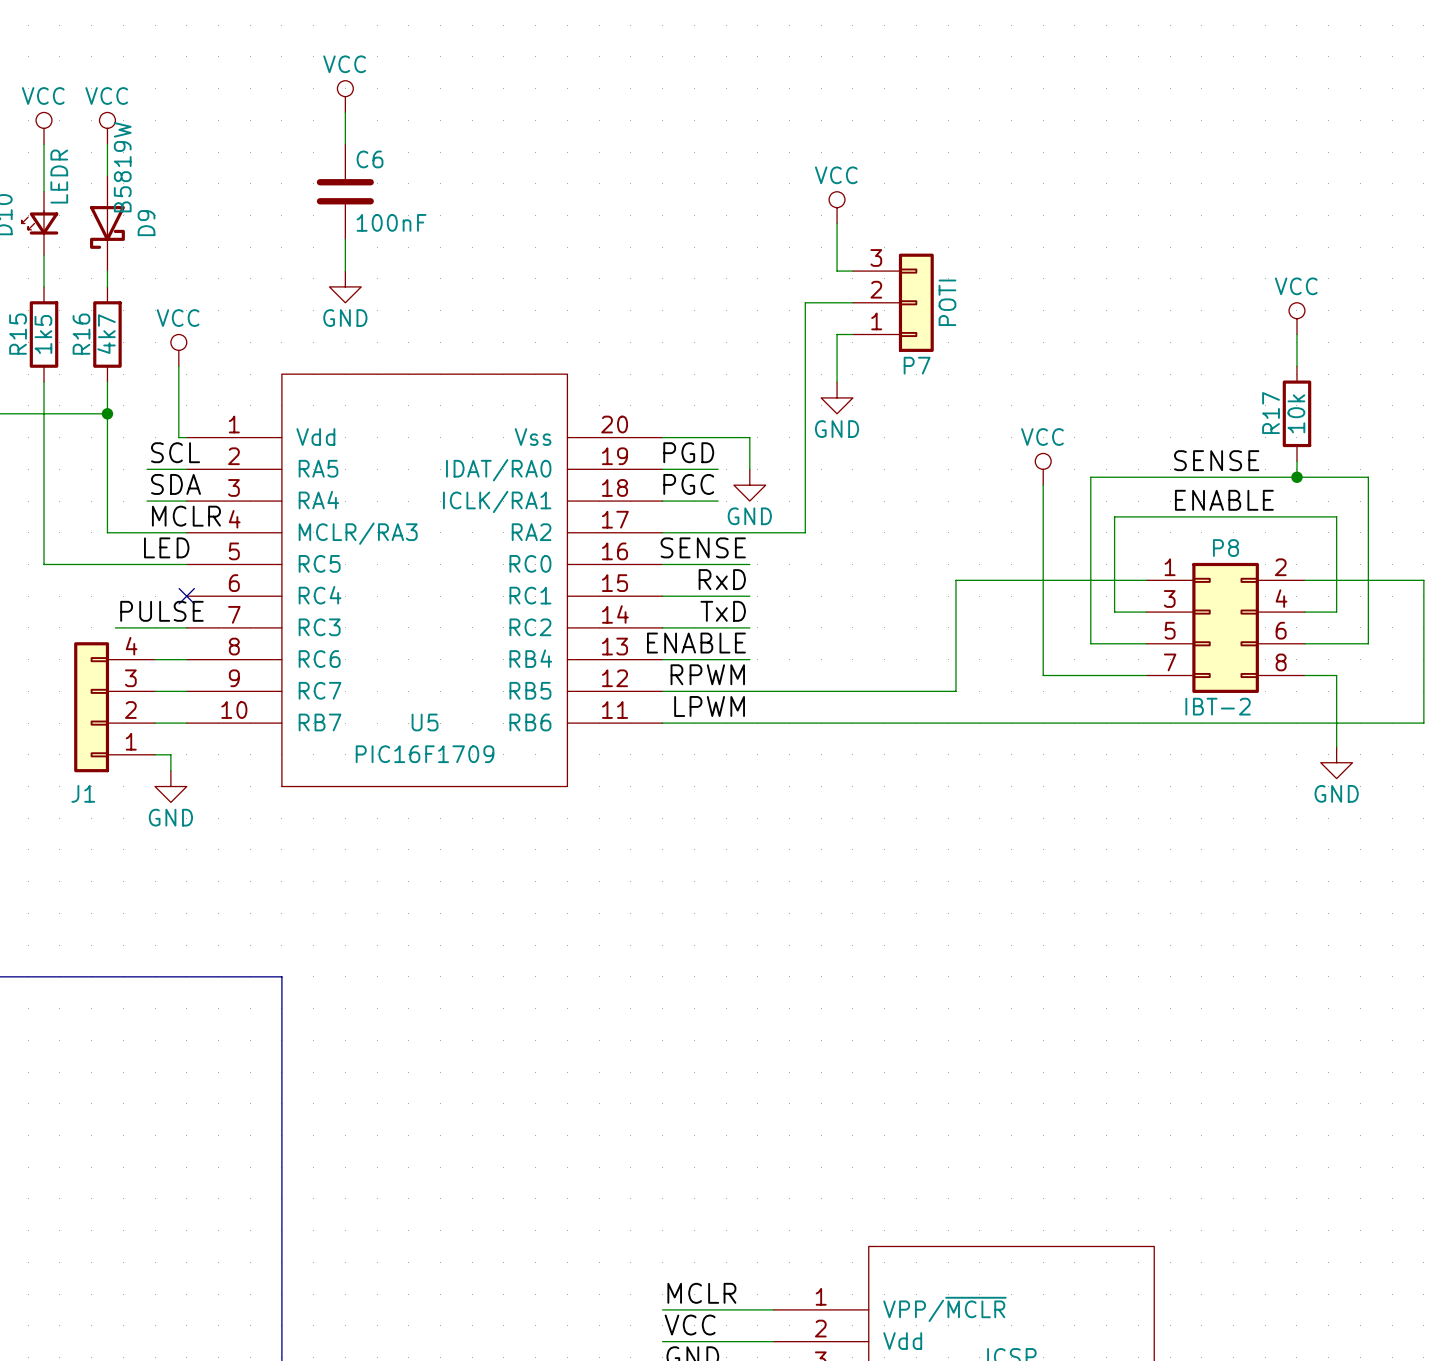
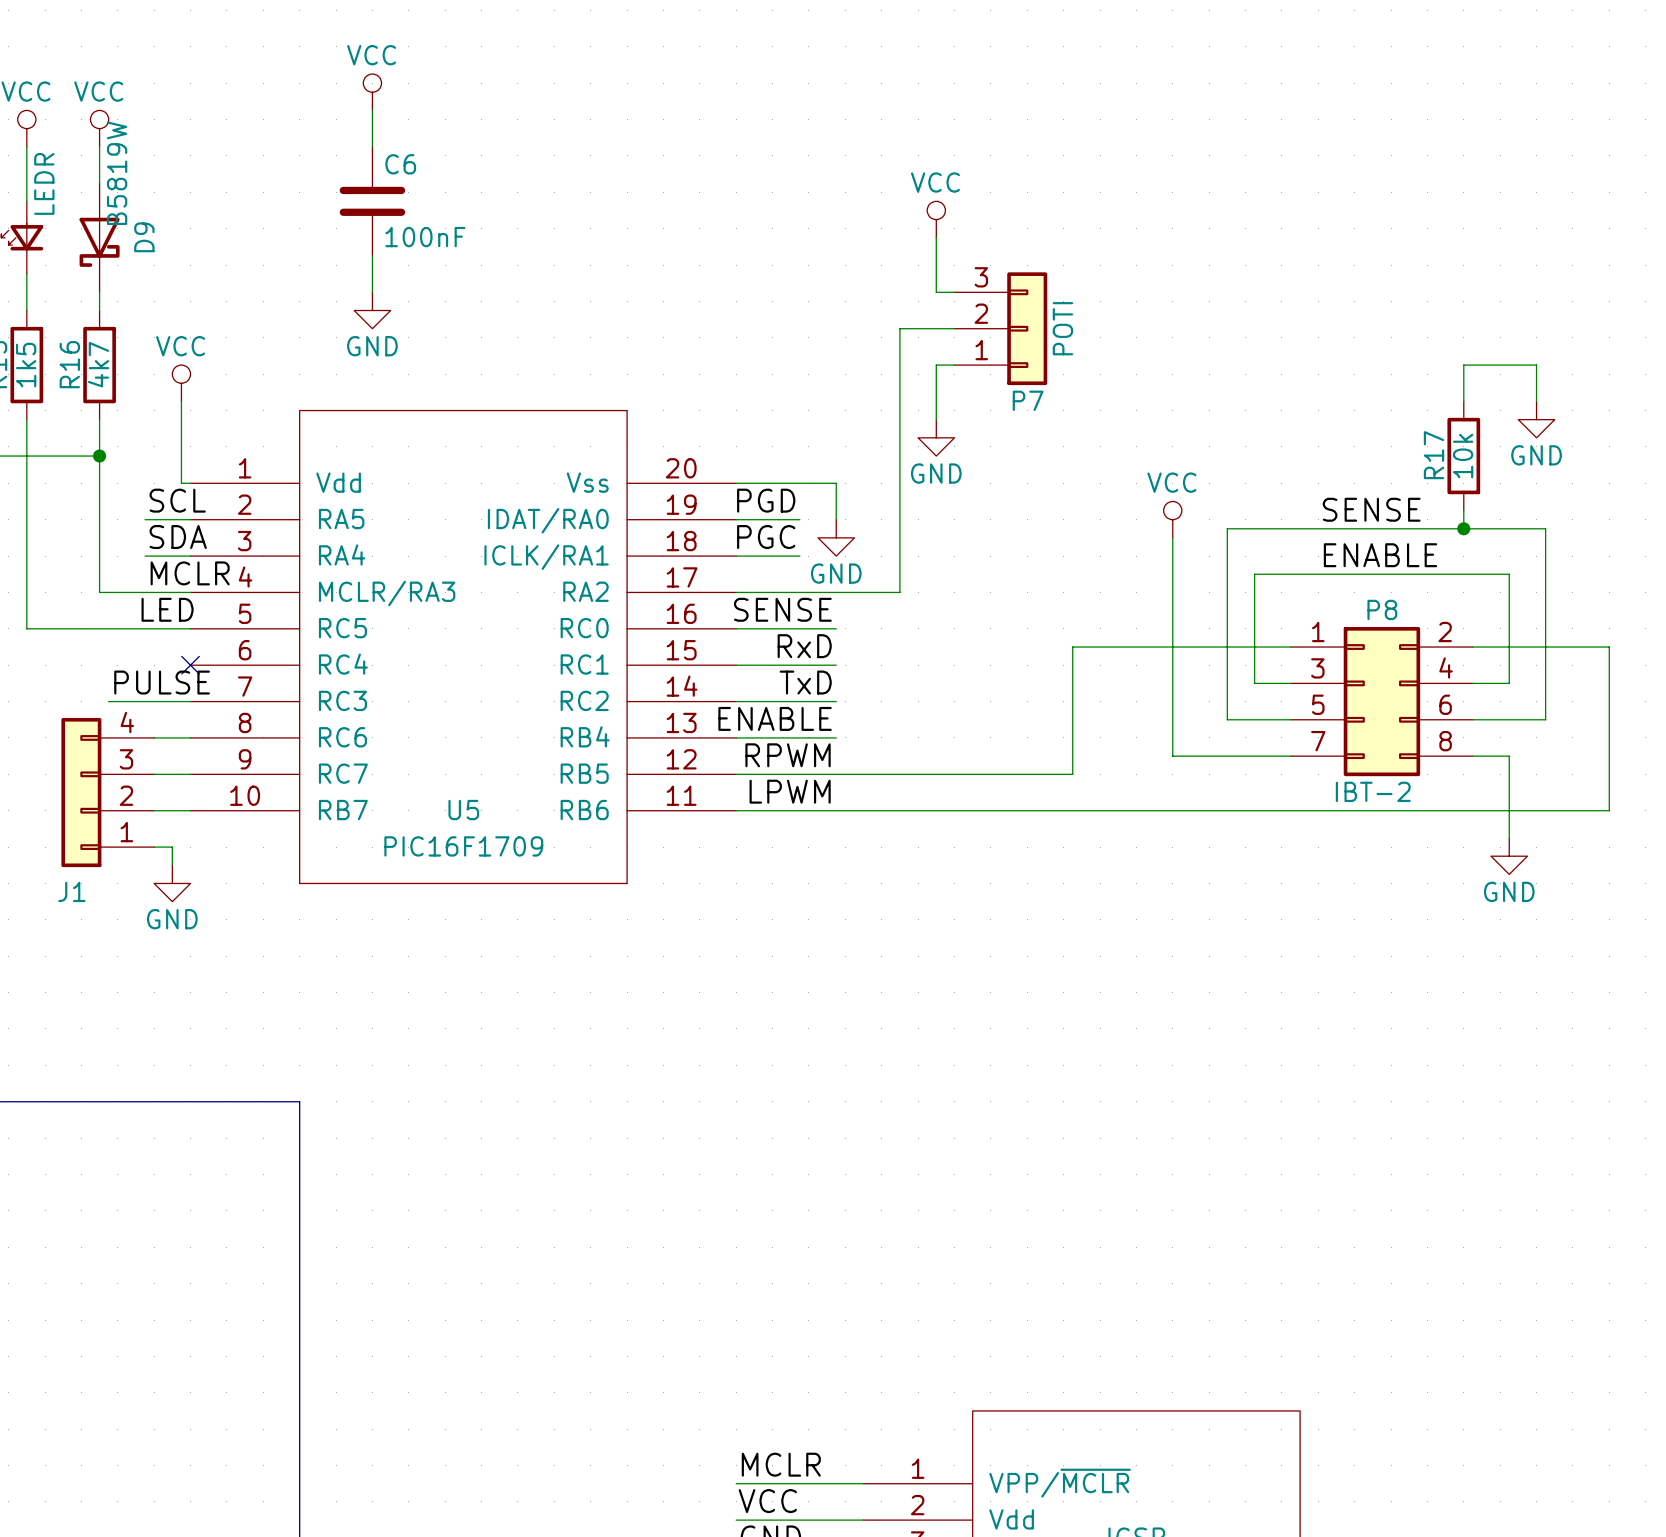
power symbol: VCC (1296, 318) -> none
wire: none -> (1463, 365) (1536, 365) (1536, 401)
power symbol: none -> GND (1536, 419)

